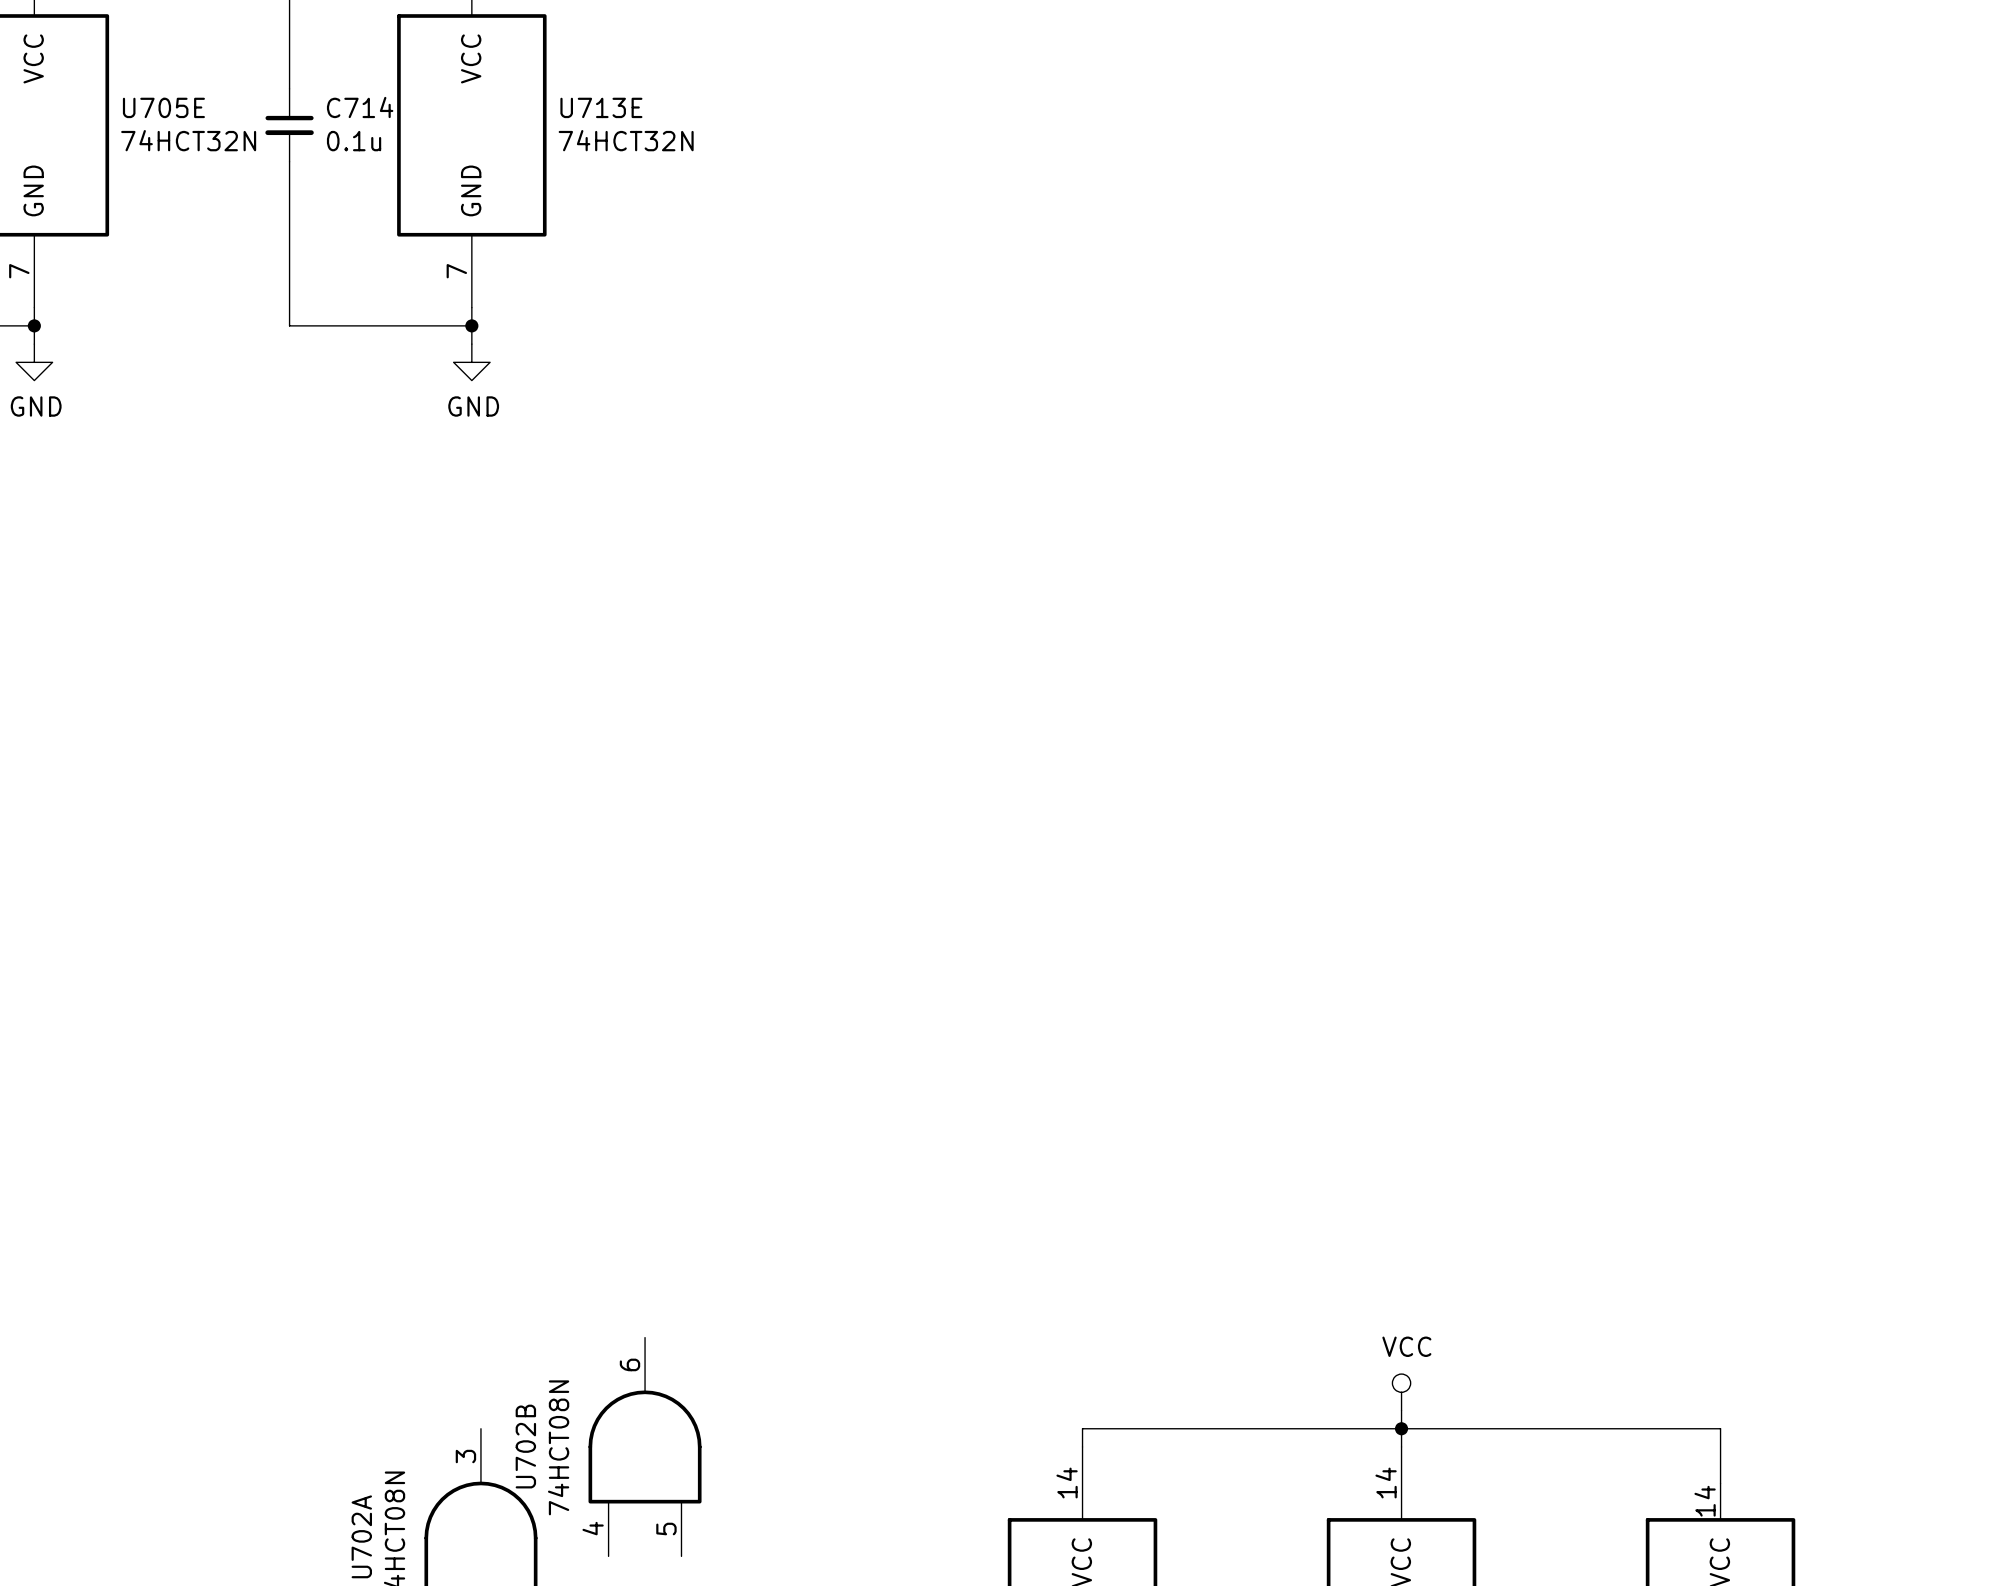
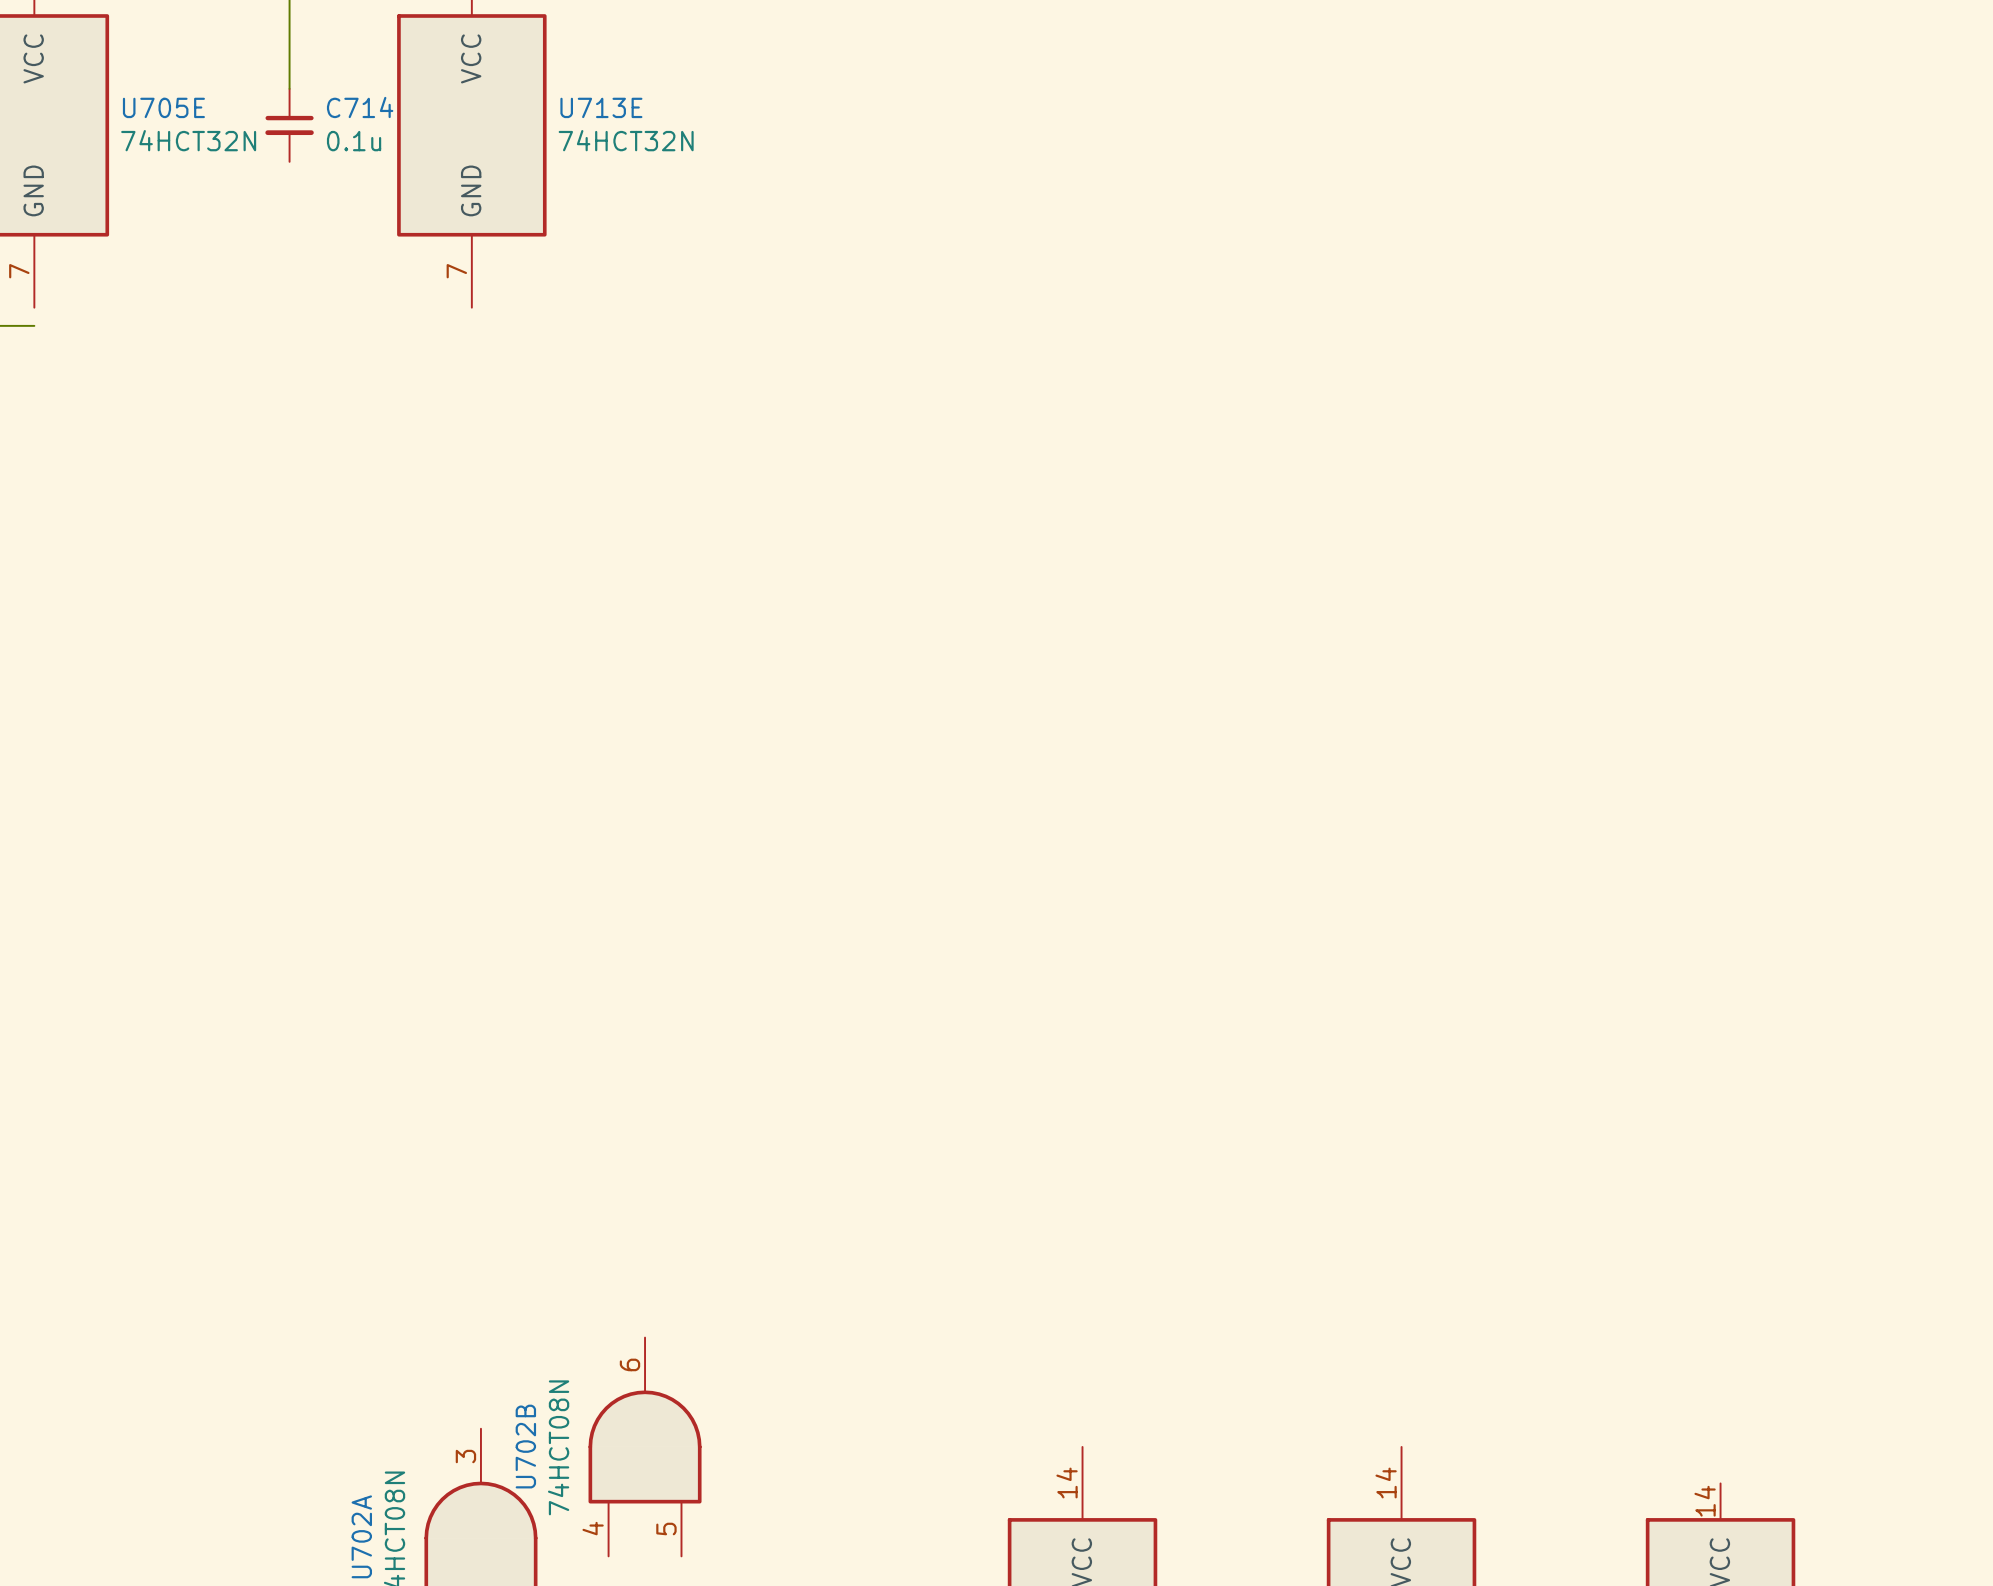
wire: (289, 161) (289, 325) (471, 325) -> none
wire: (34, 307) (34, 344) -> none
wire: (471, 307) (471, 344) -> none
junction: (34, 325) -> none
junction: (471, 325) -> none
power symbol: GND (34, 362) -> none
power symbol: GND (471, 362) -> none
power symbol: VCC (1401, 1392) -> none
wire: (1401, 1410) (1401, 1446) -> none
junction: (1401, 1428) -> none
wire: (1082, 1446) (1082, 1428) (1720, 1428) (1720, 1483) -> none

